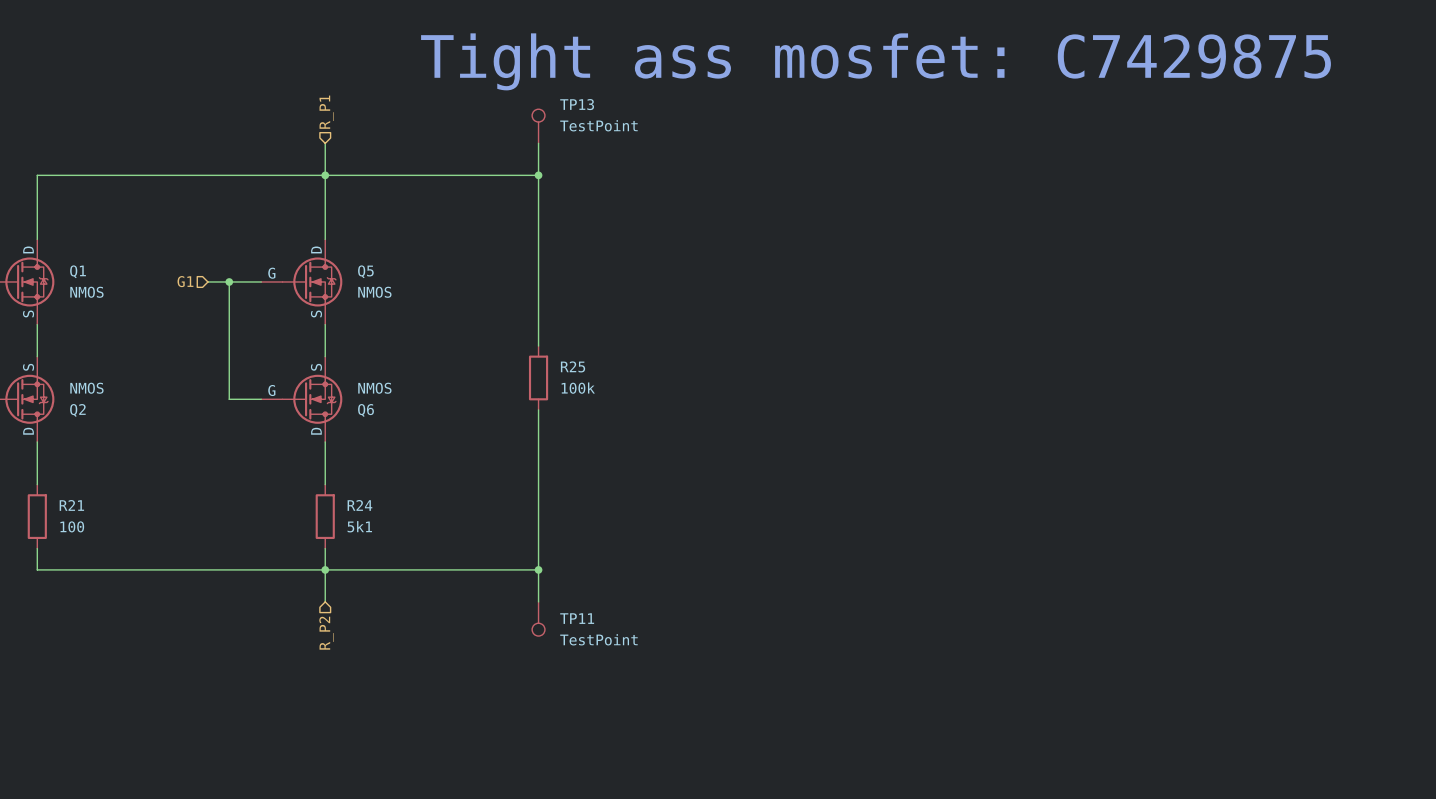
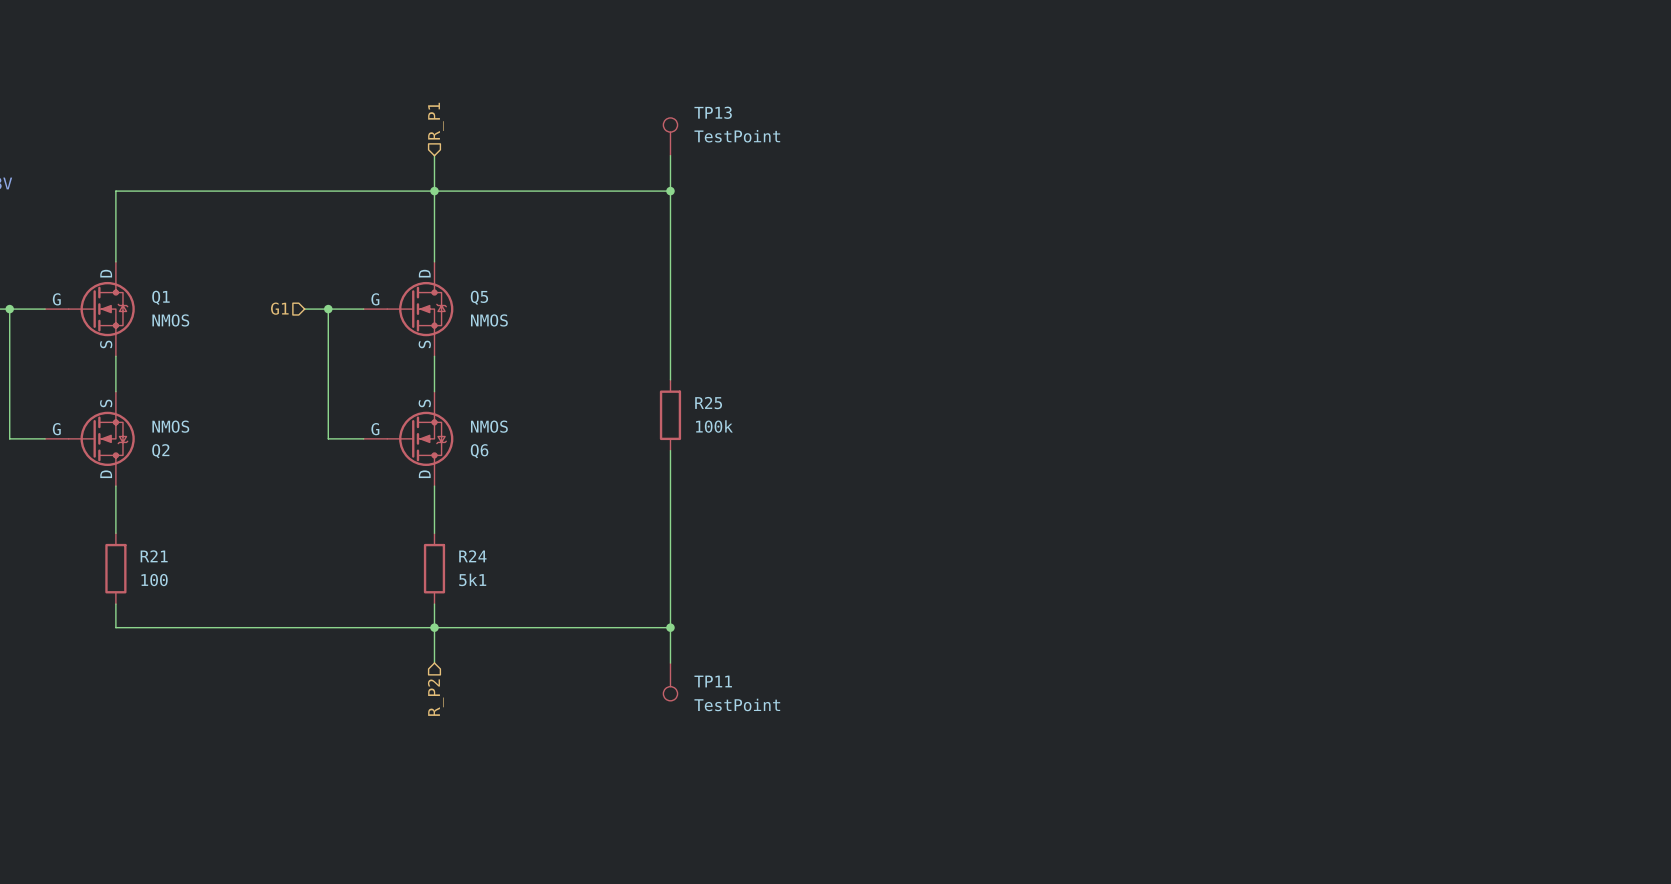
text: Tight ass mosfet: C7429875 (876, 61) -> none

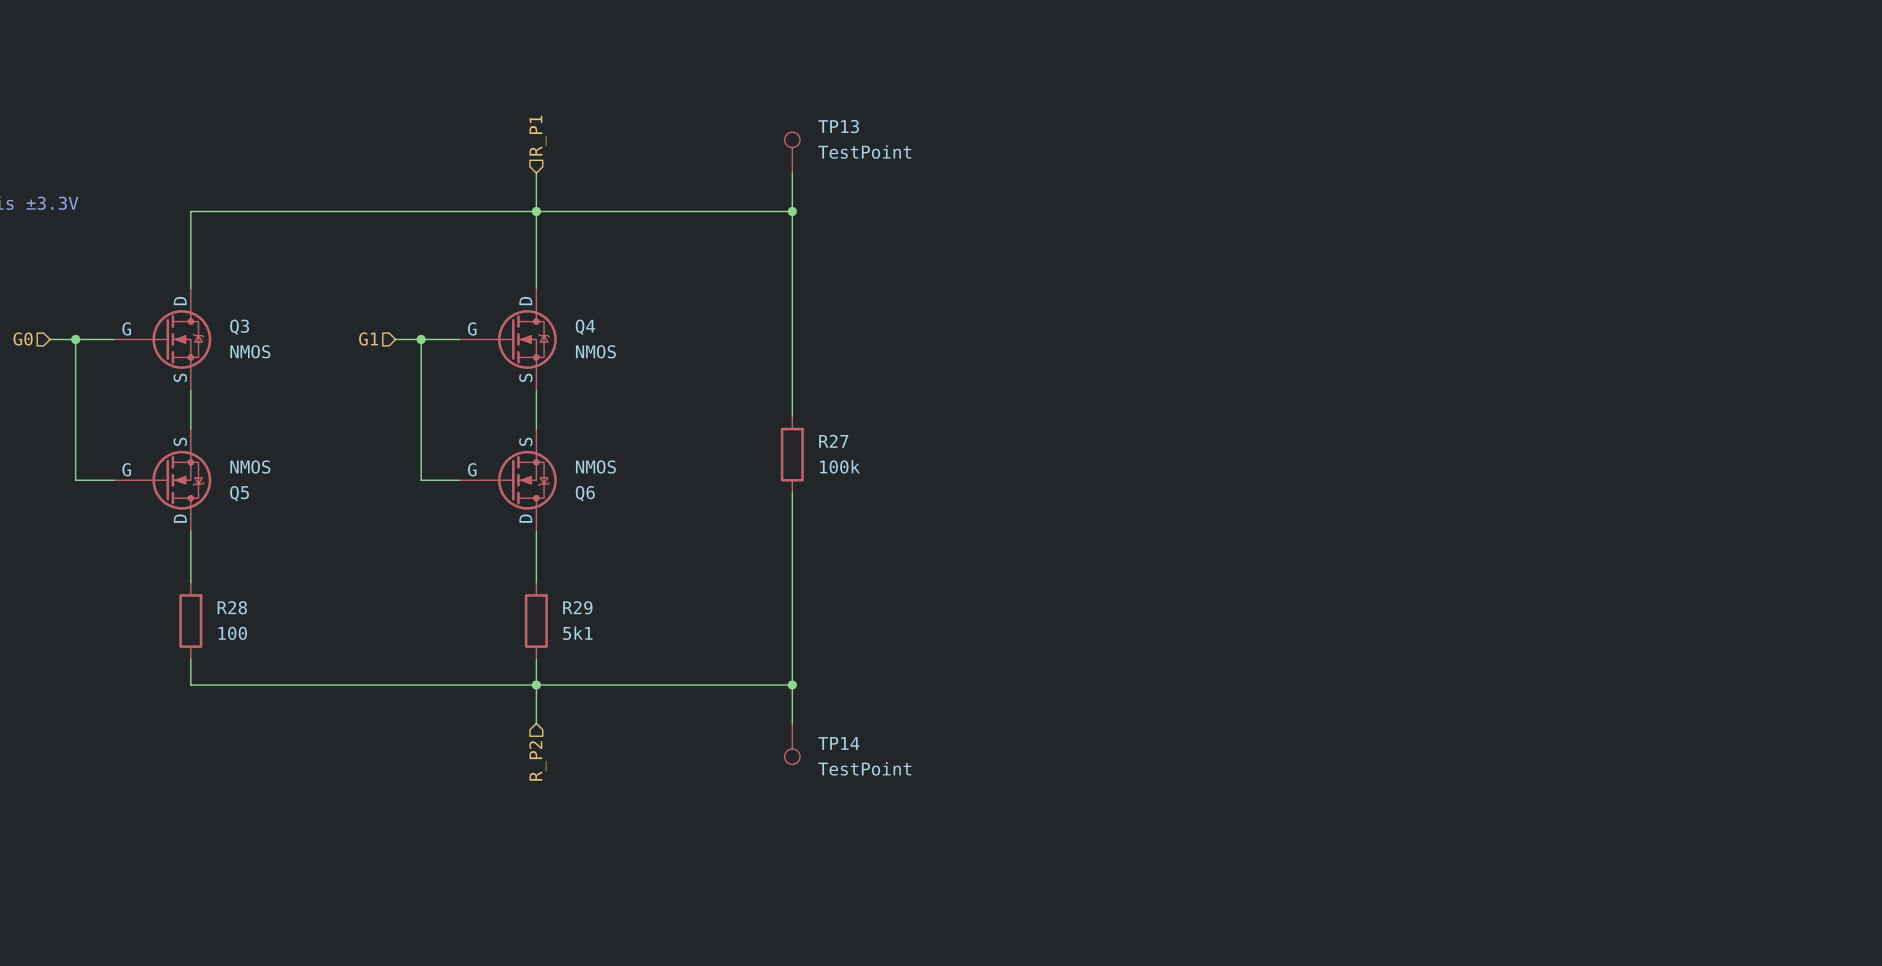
Q1 name: Q1 (160, 297) -> Q3 (239, 327)
Q5 name: Q5 (479, 297) -> Q4 (585, 327)
R25 name: R25 (708, 403) -> R27 (833, 441)
Q2 name: Q2 (160, 451) -> Q5 (239, 493)
R21 name: R21 (154, 556) -> R28 (232, 607)
R24 name: R24 (472, 556) -> R29 (577, 607)
TP11 name: TP11 (713, 681) -> TP14 (838, 743)

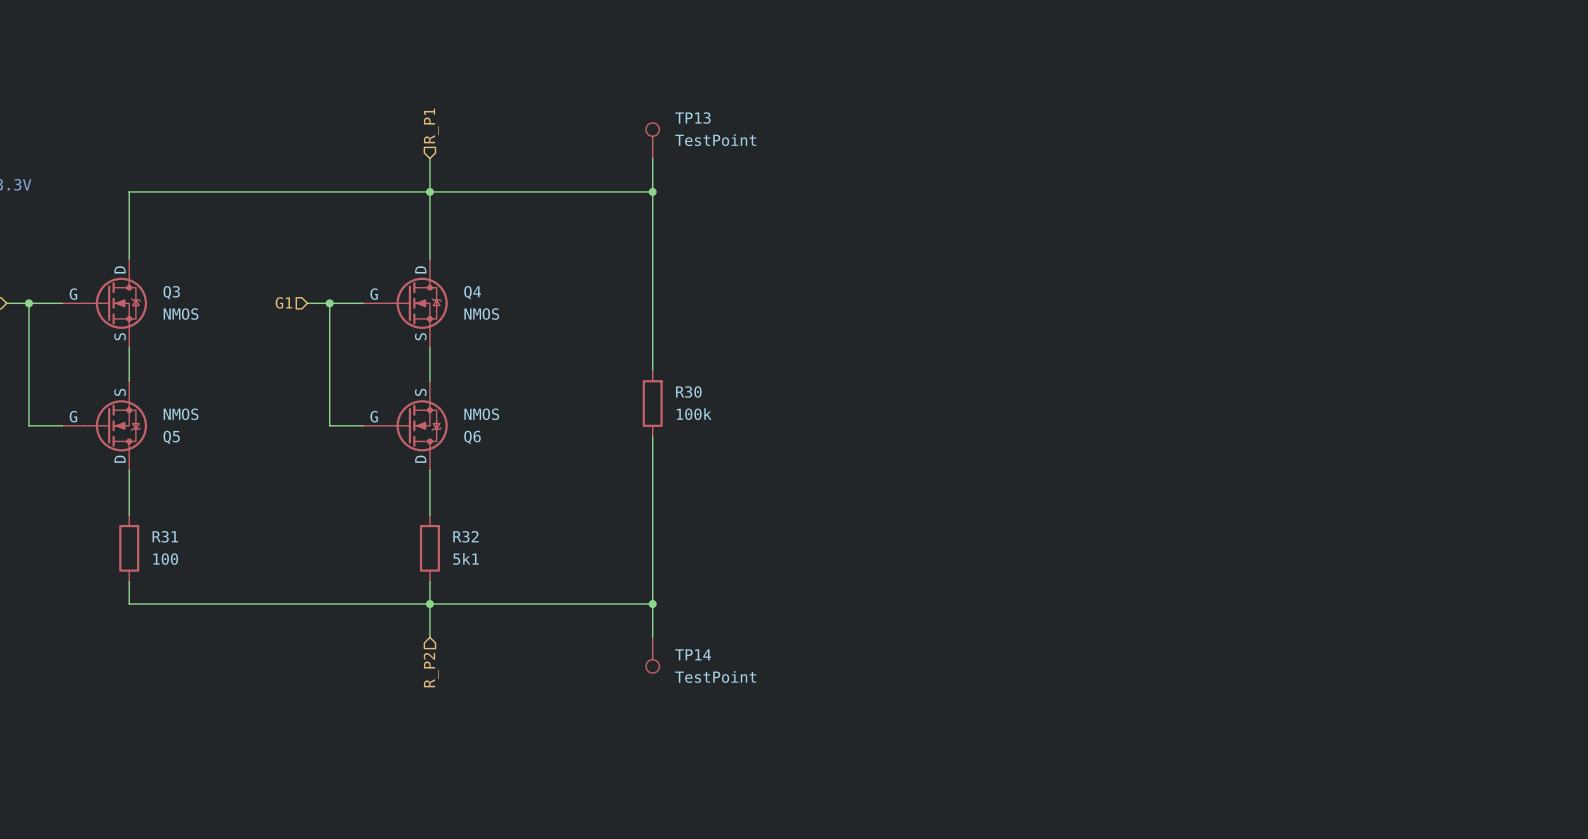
R27 name: R27 (833, 441) -> R30 (688, 392)
R28 name: R28 (232, 607) -> R31 (165, 536)
R29 name: R29 (577, 607) -> R32 (465, 536)

